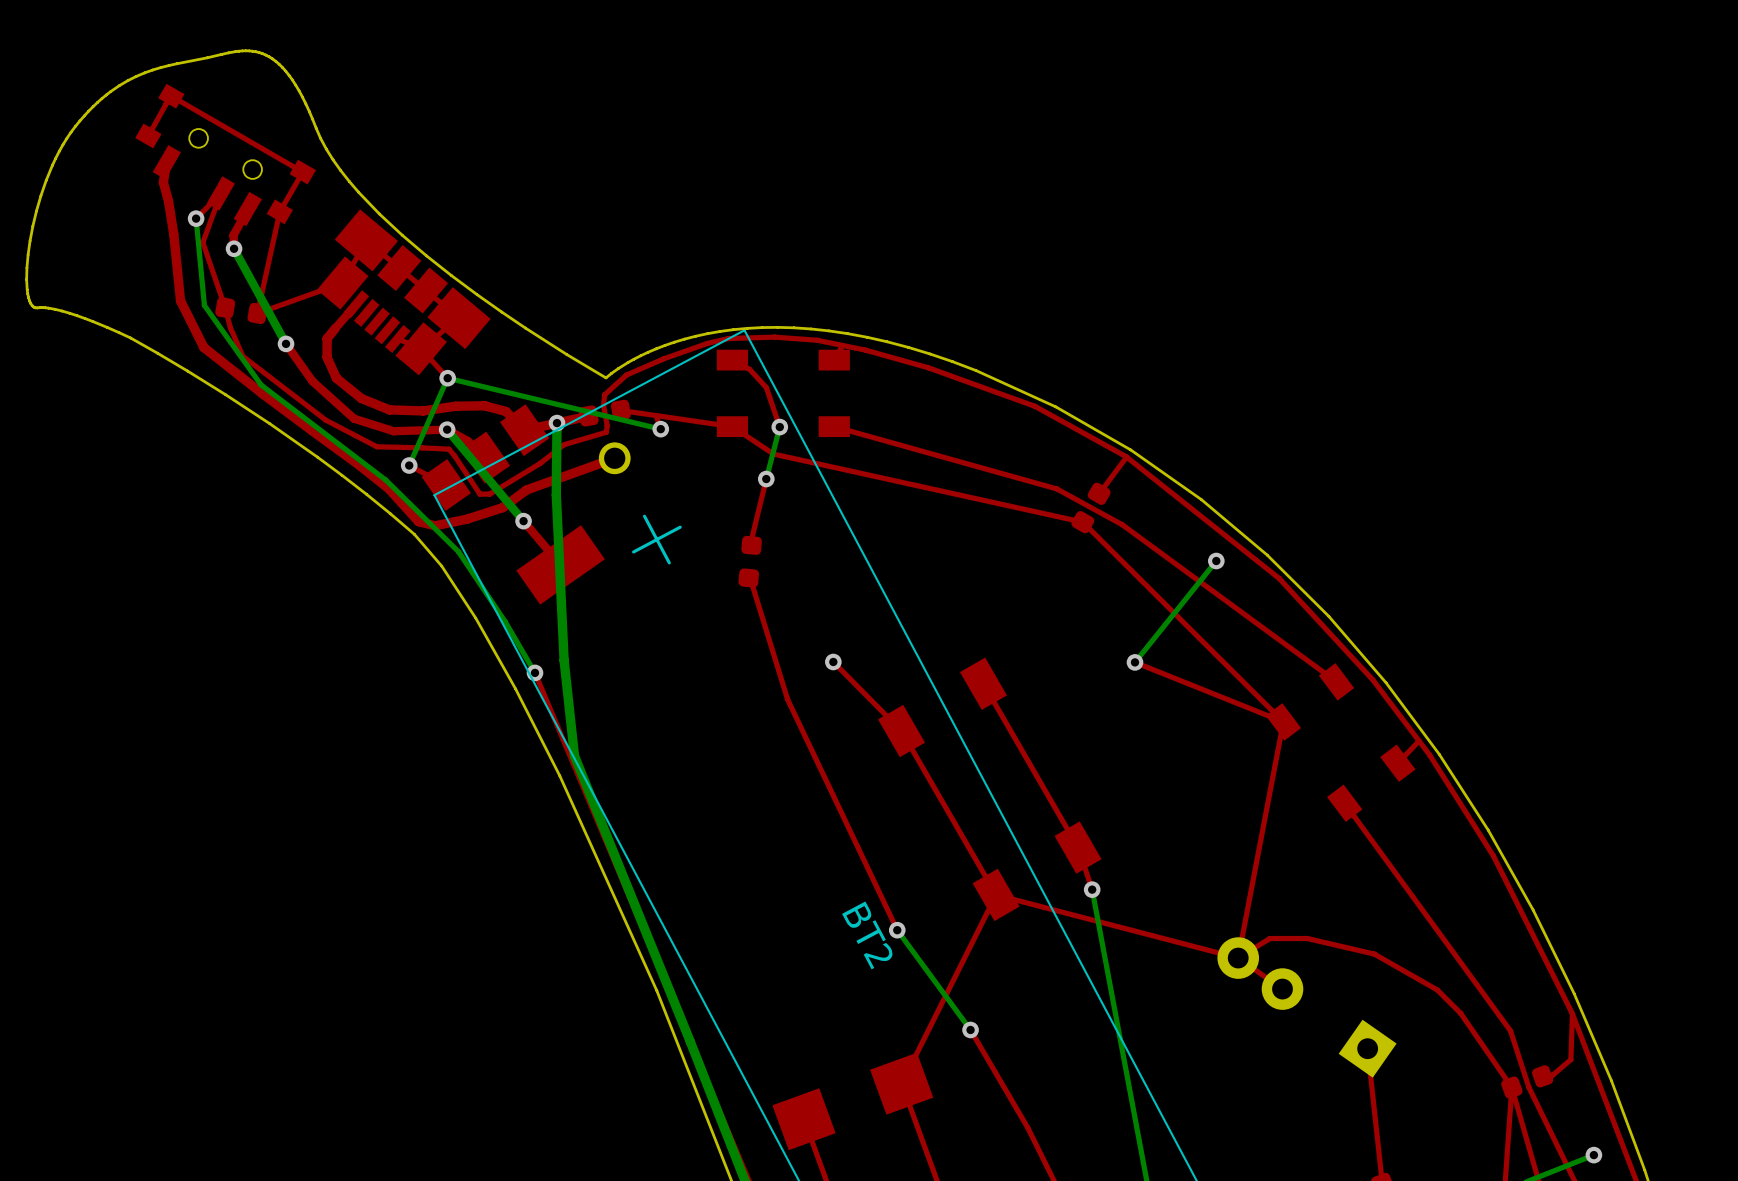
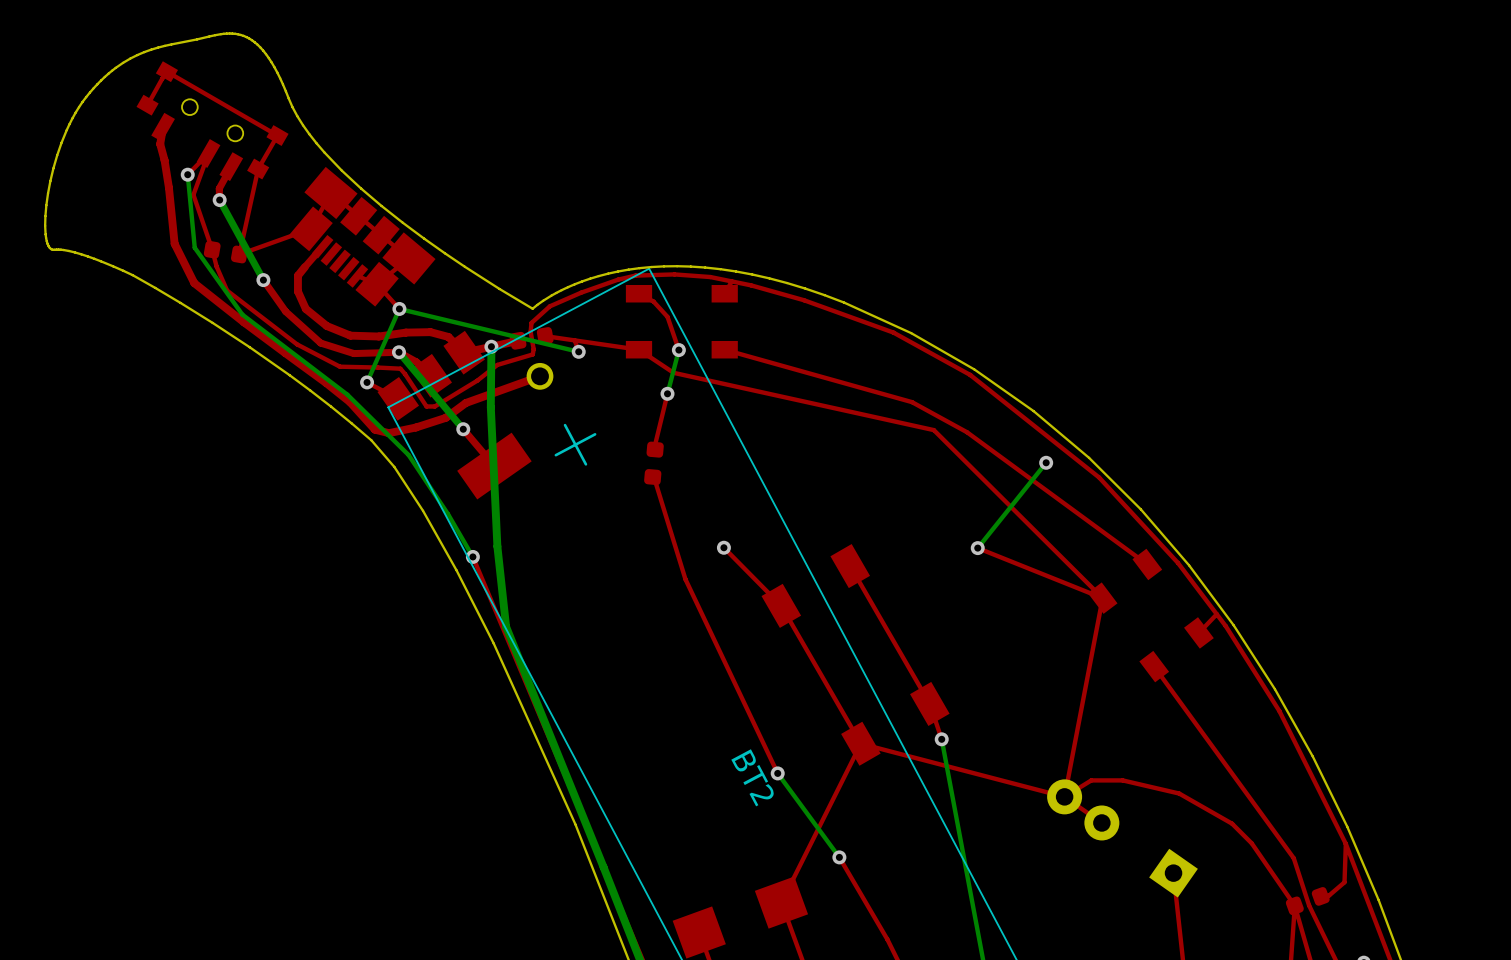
top track: (1126, 457) (1099, 493) -> none
part: (1091, 507) -> none

